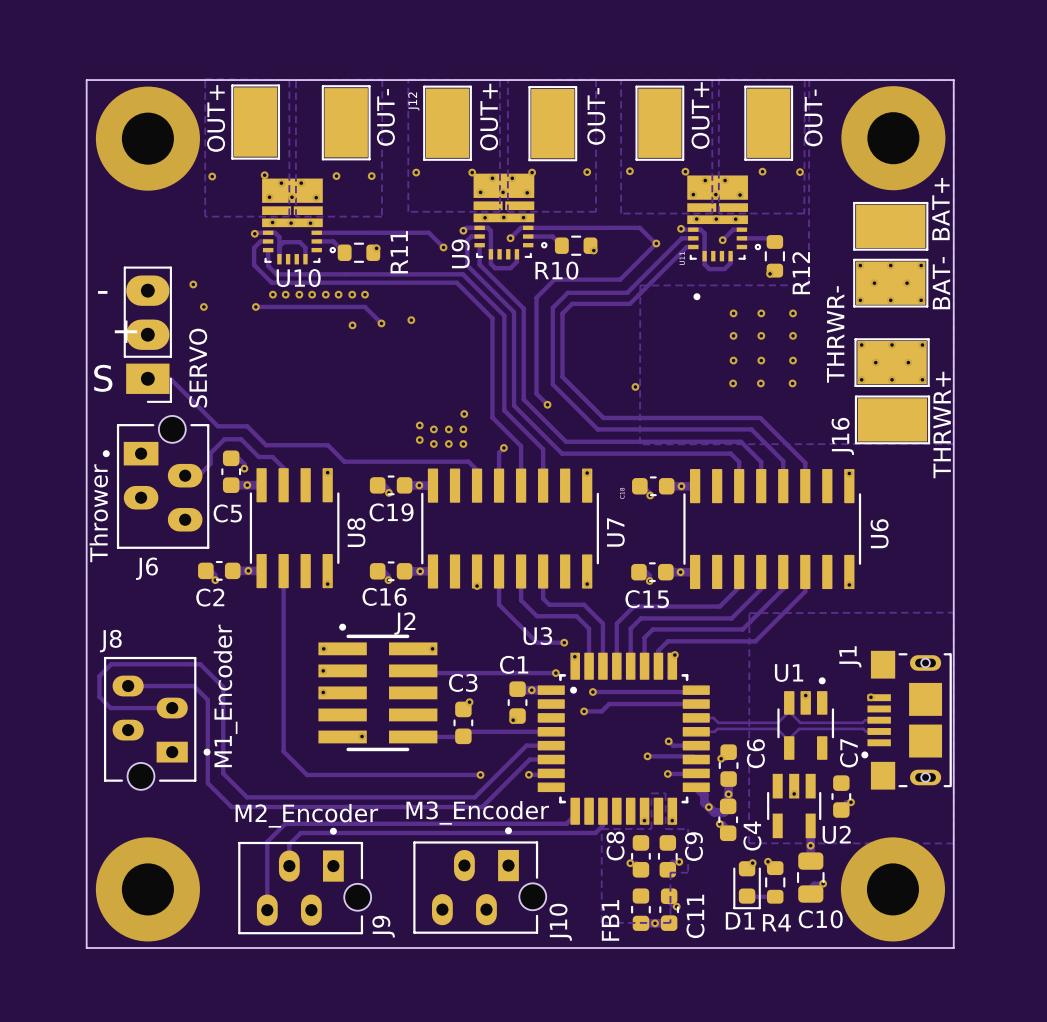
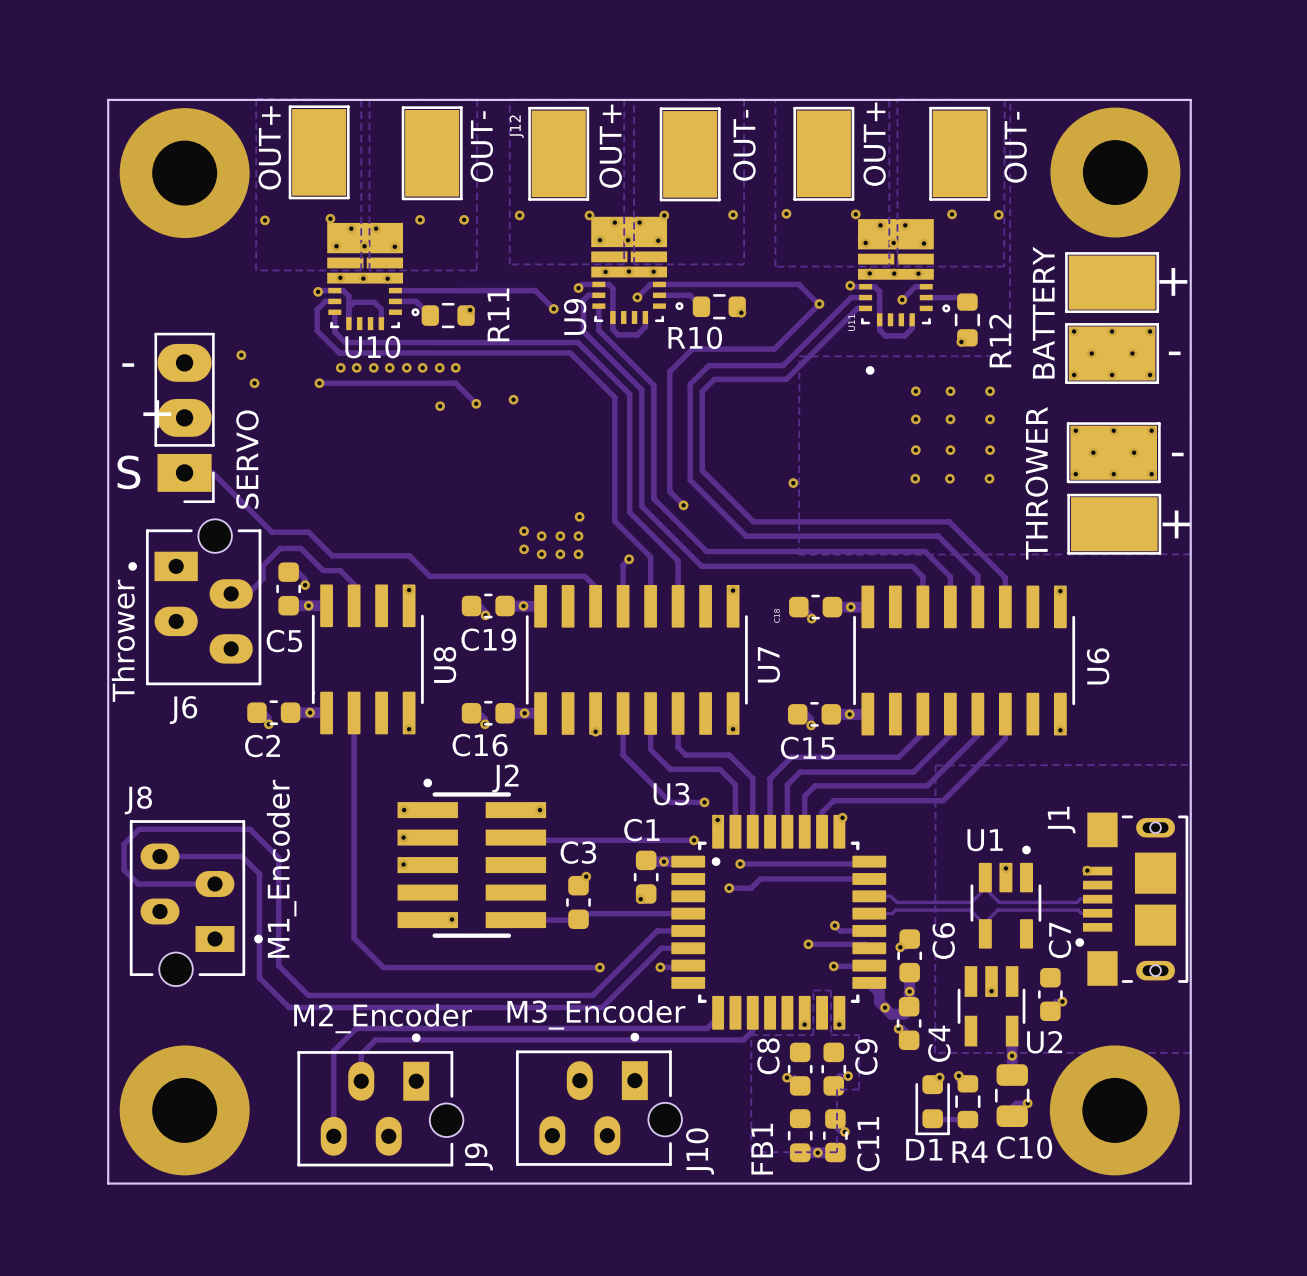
part value: BAT+ (940, 209) -> + (1173, 281)
text: none -> BATTERY (1043, 312)
part value: BAT- (941, 283) -> - (1174, 353)
part value: THRWR- (835, 334) -> - (1177, 454)
text: none -> THROWER (1036, 483)
J16 value: THRWR+ (942, 425) -> + (1176, 524)
J16 name: J16 (842, 436) -> none

